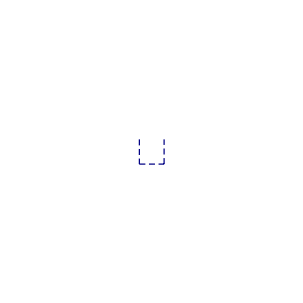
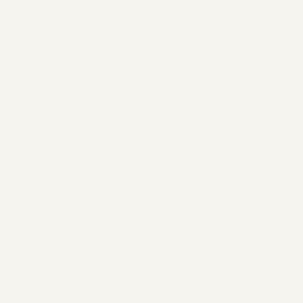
line: (139, 139) (139, 164) (164, 164) (164, 139) -> none

